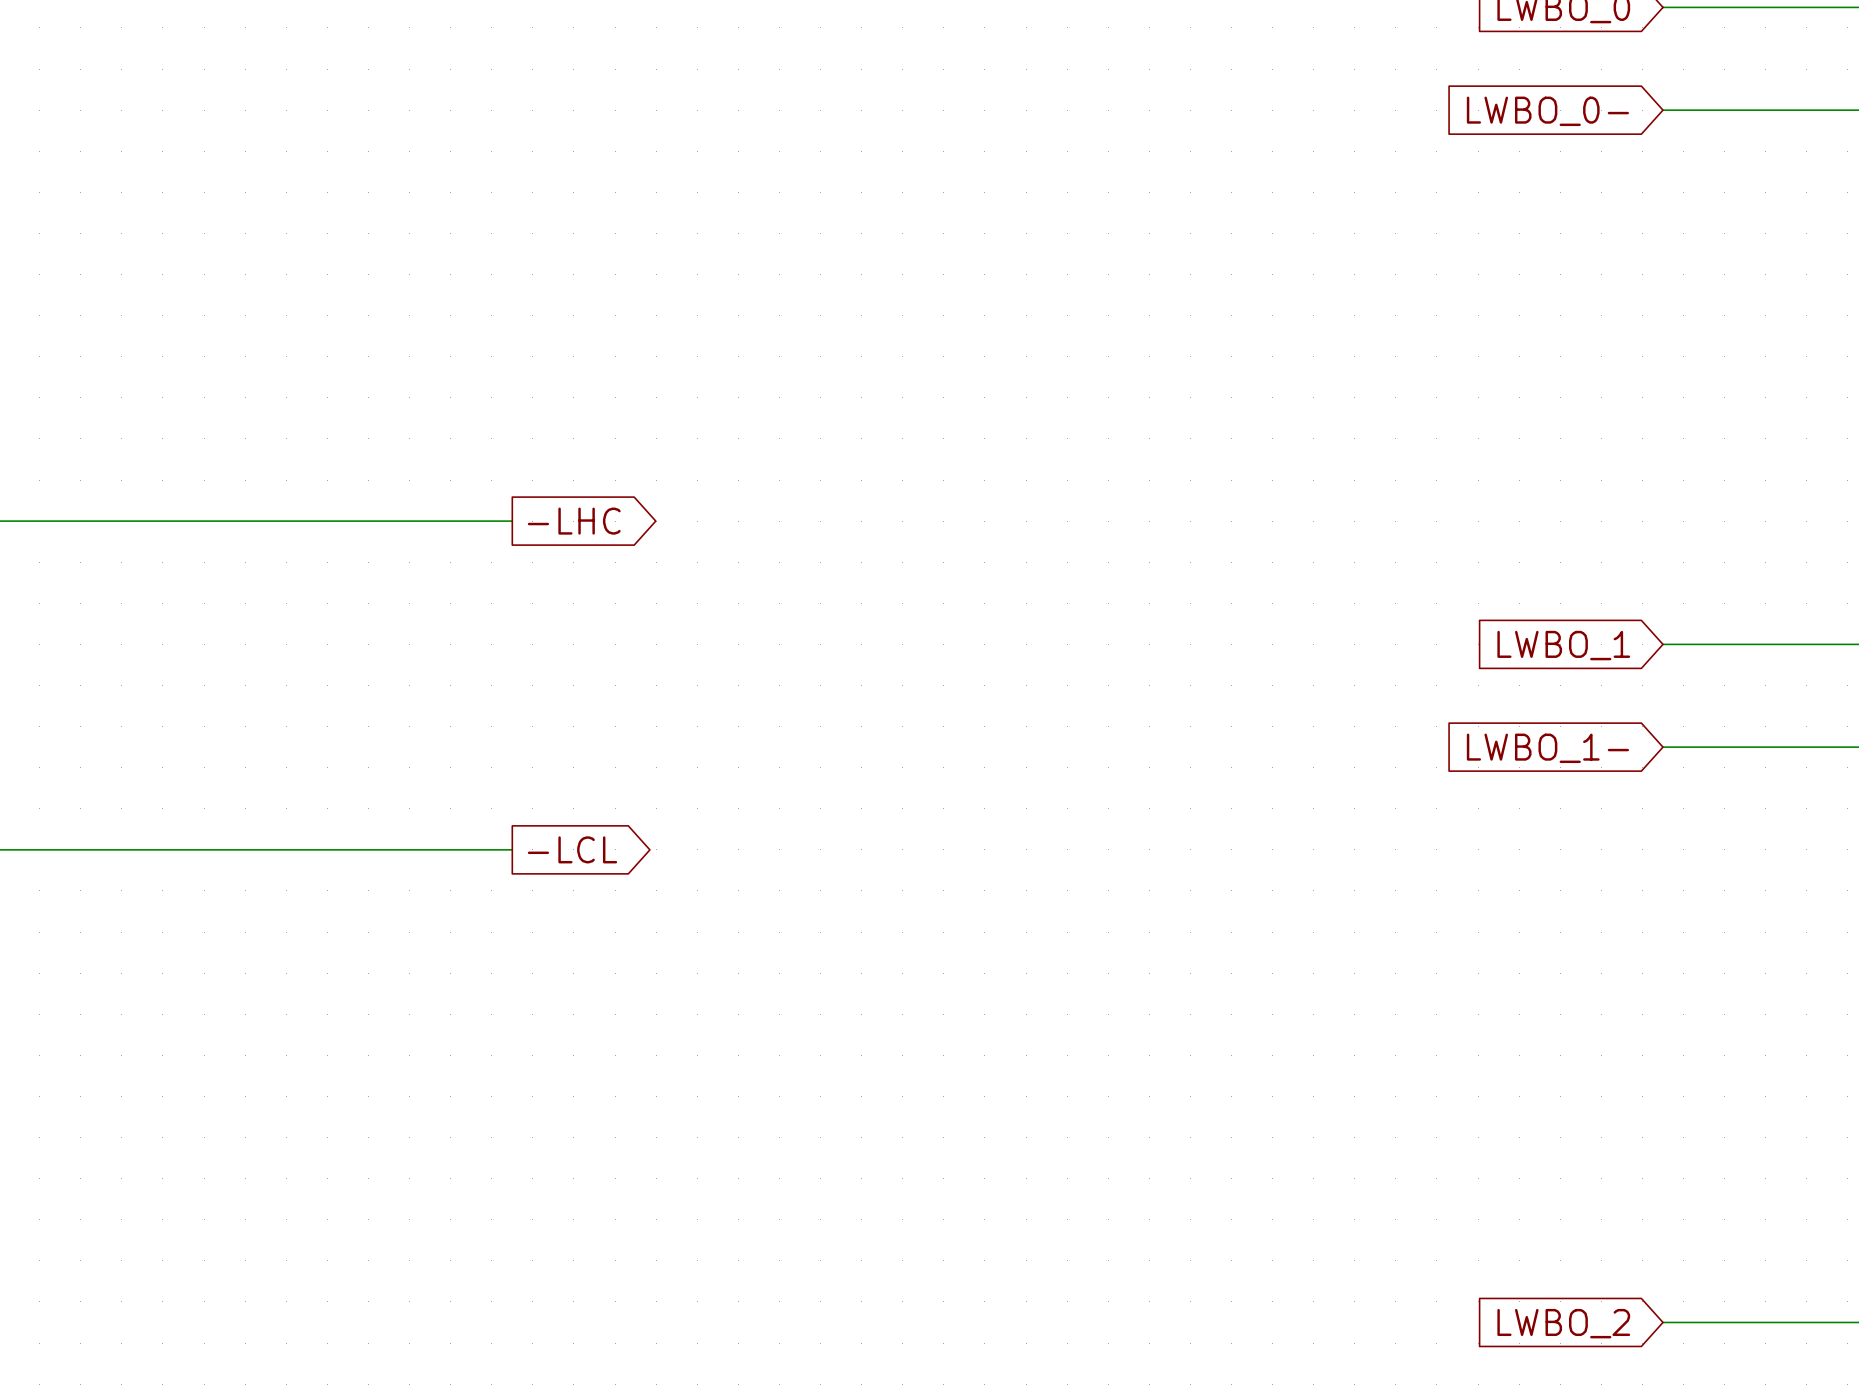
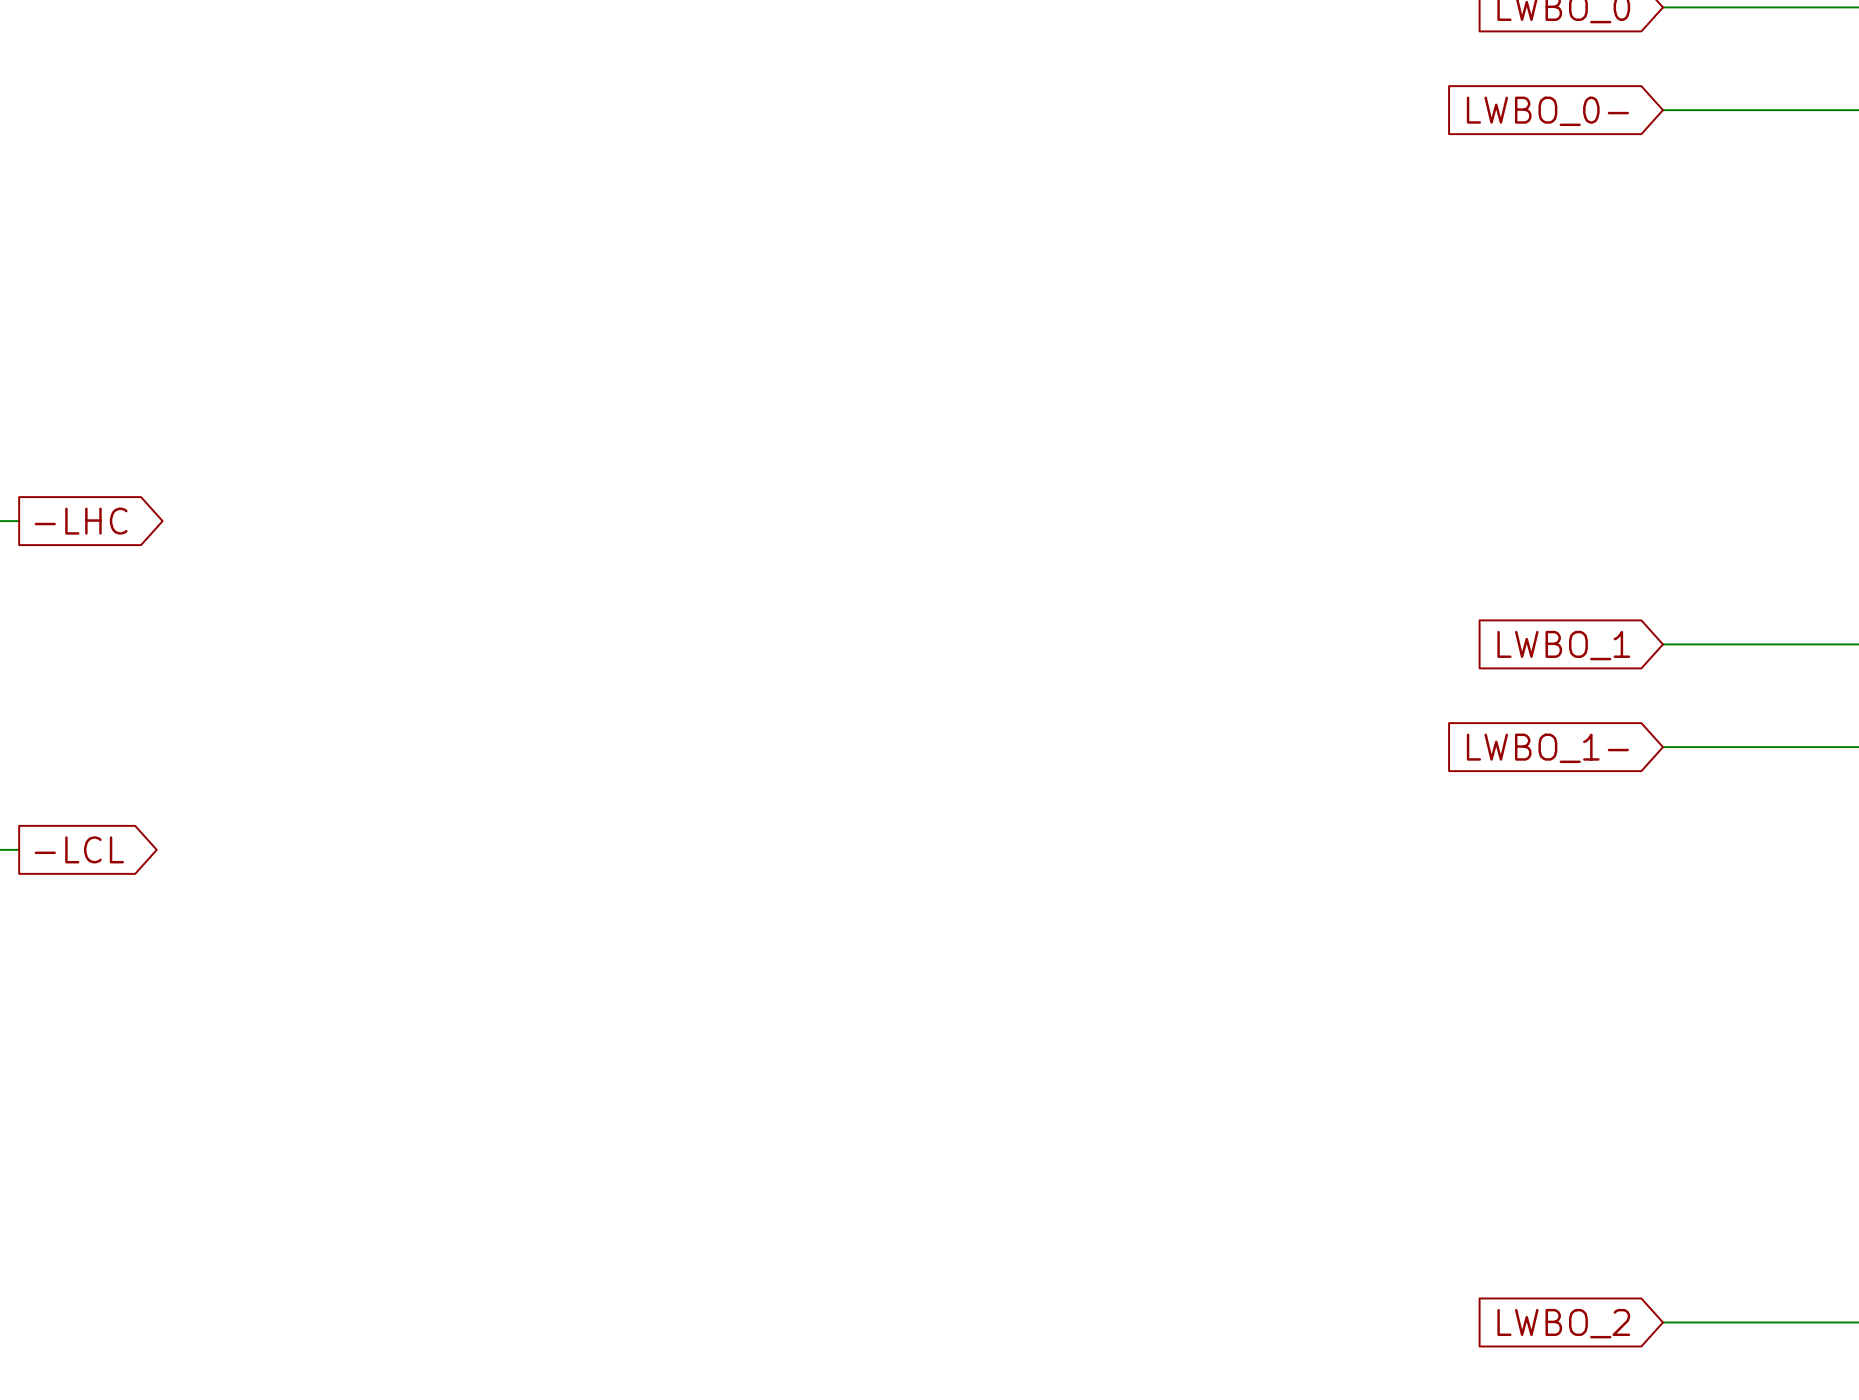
wire: (19, 521) (512, 521) -> none
global label: none -> -LHC (81, 521)
global label: -LHC (574, 521) -> none
wire: (19, 849) (512, 849) -> none
global label: none -> -LCL (79, 849)
global label: -LCL (572, 849) -> none

